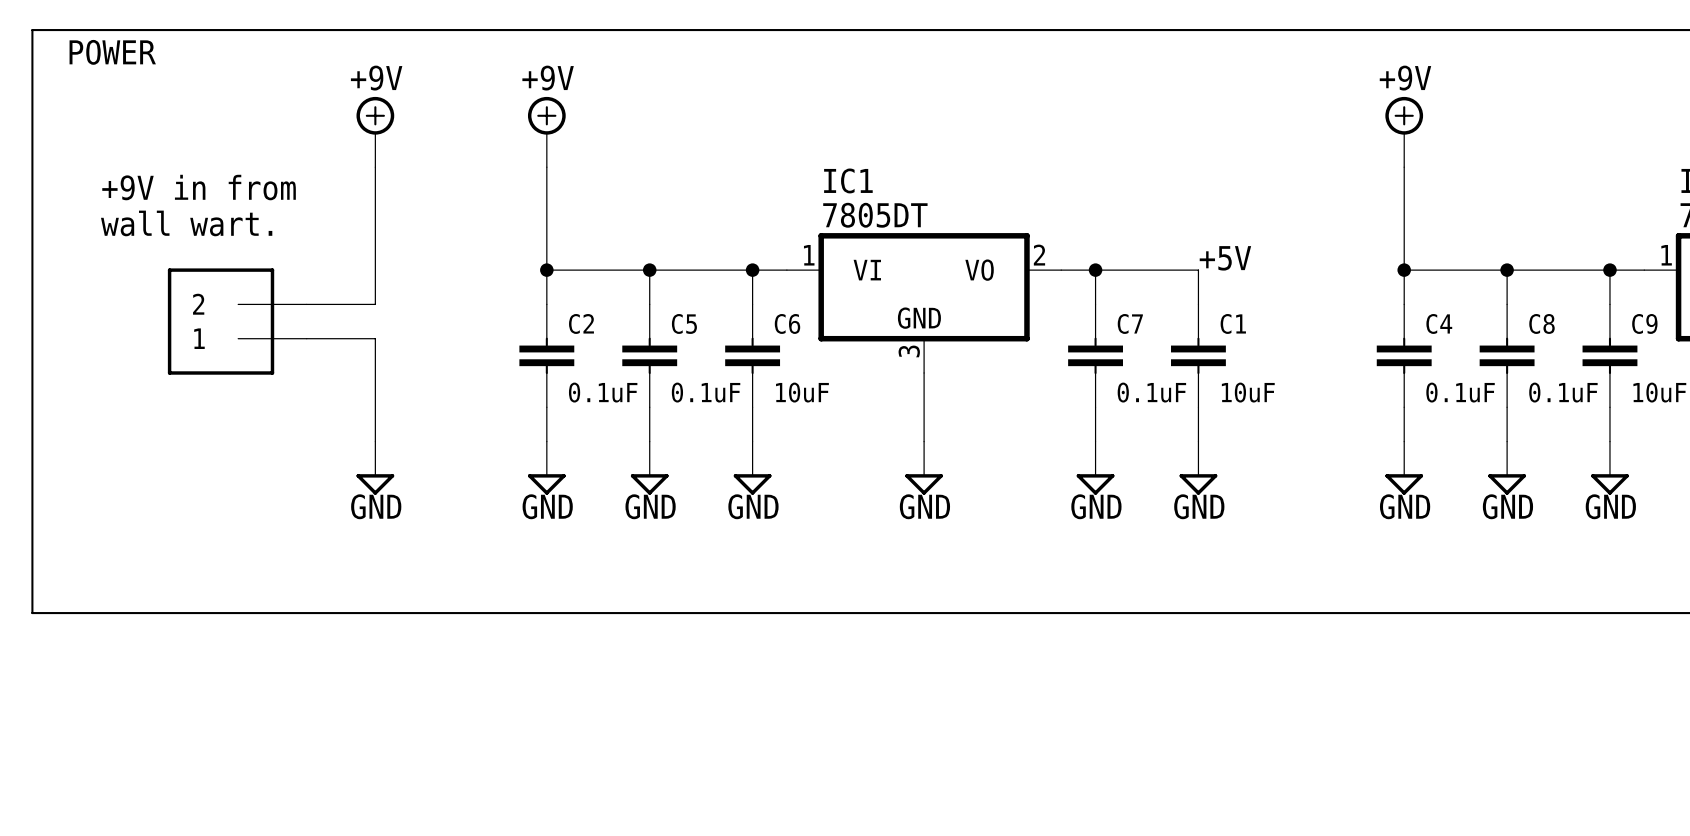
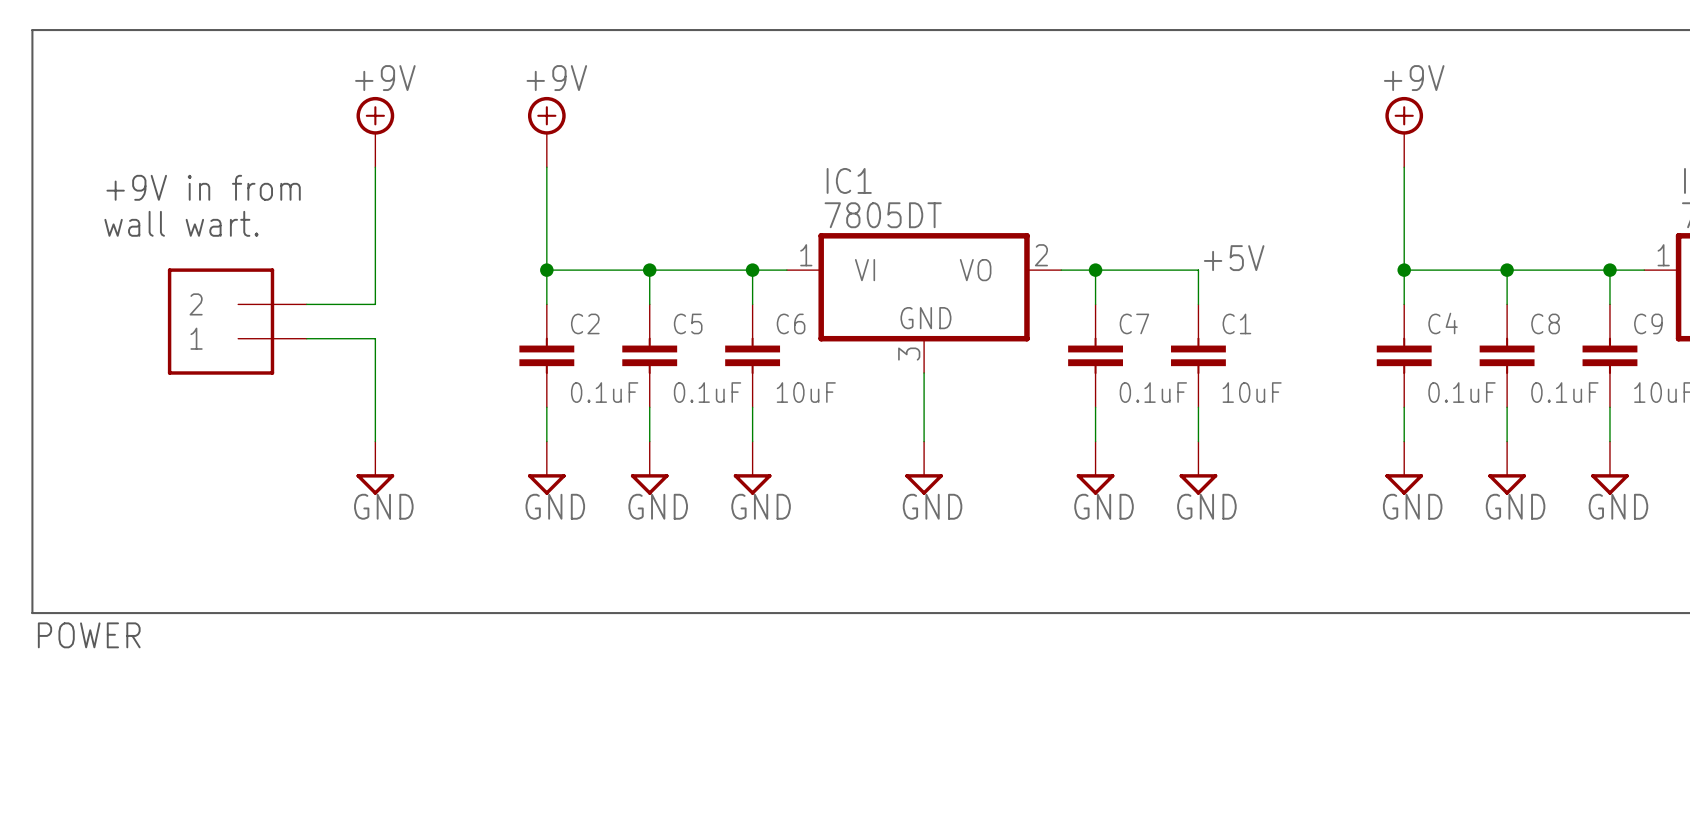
text: POWER (112, 52) -> none
text: none -> POWER (89, 635)

